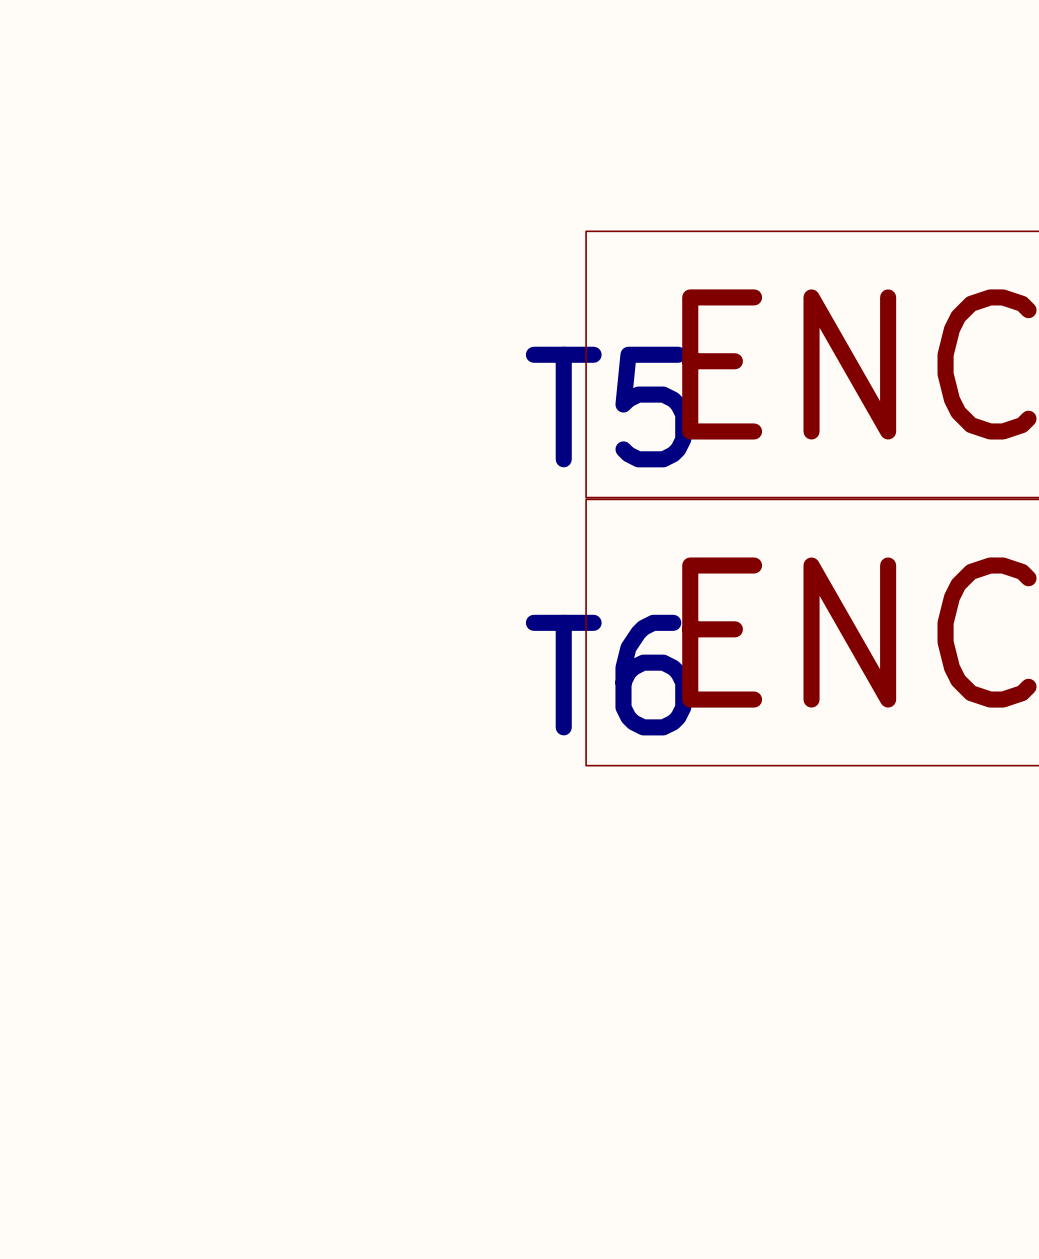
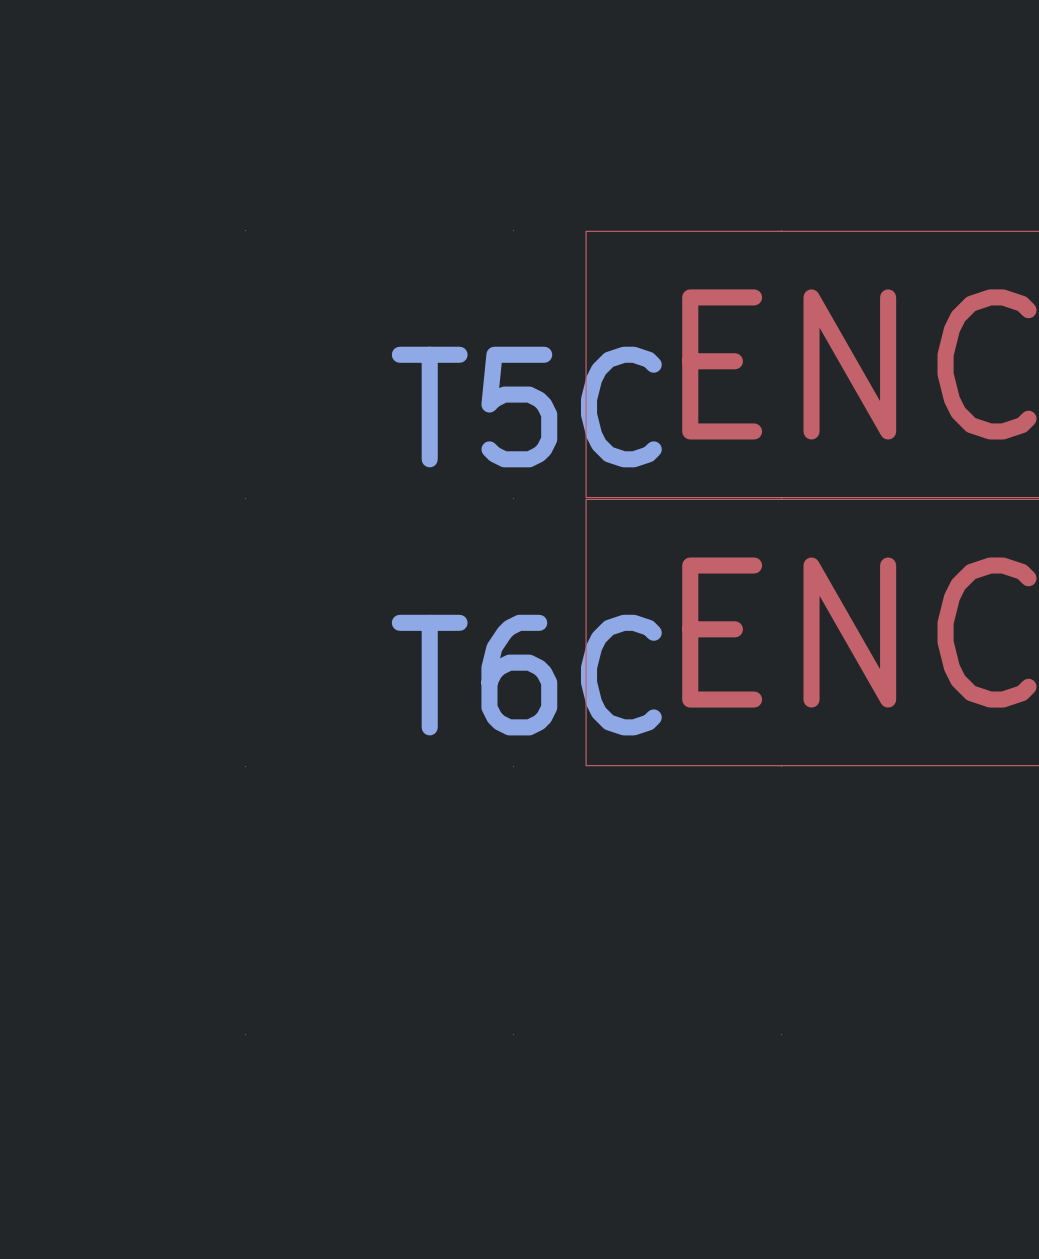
text: T5 (608, 407) -> T5C (526, 407)
text: T6 (608, 675) -> T6C (526, 675)

